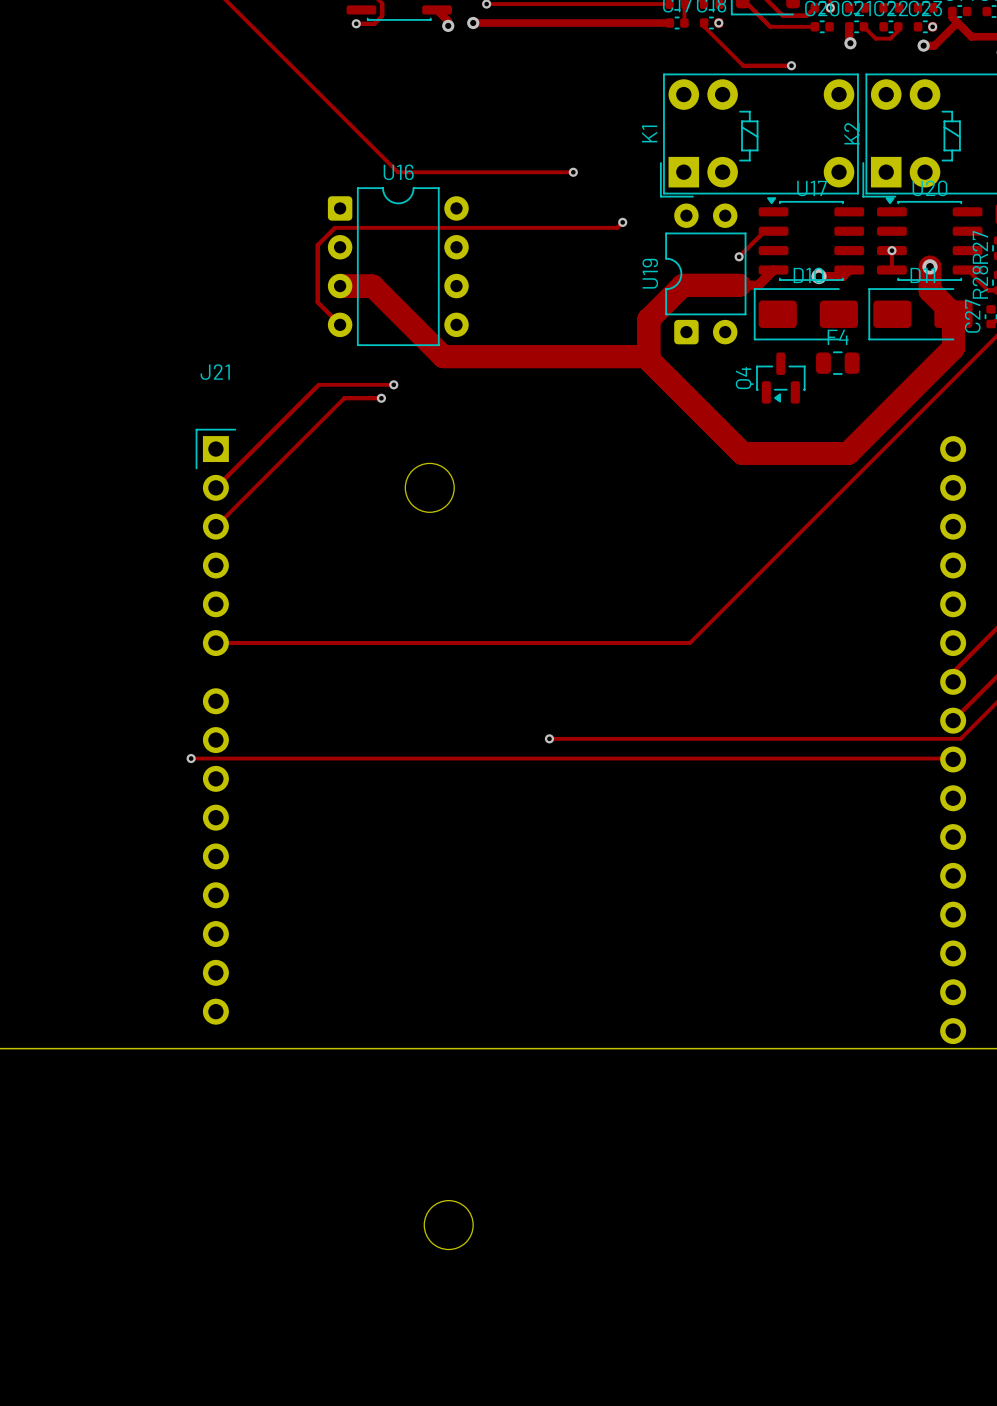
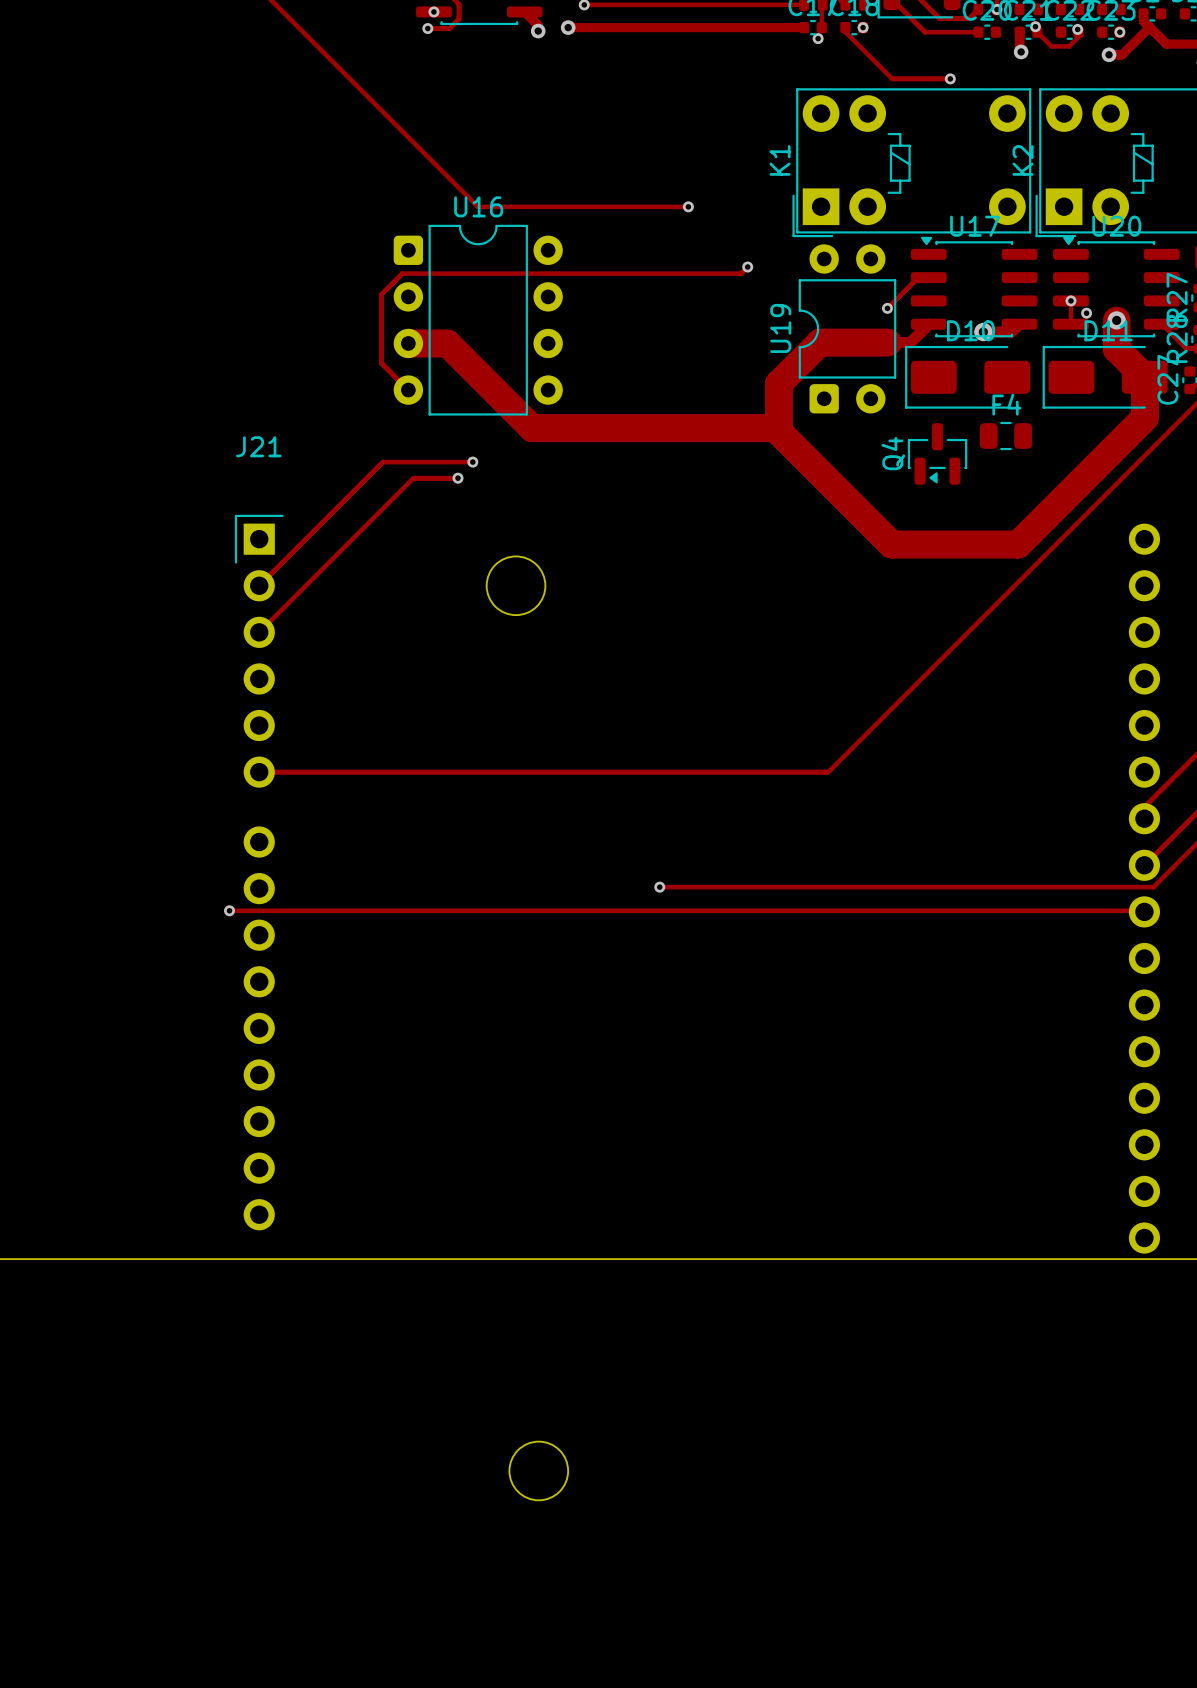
via: none -> (433, 11)
via: none -> (1035, 26)
via: none -> (1077, 29)
via: none -> (818, 38)
via: none -> (1086, 313)

